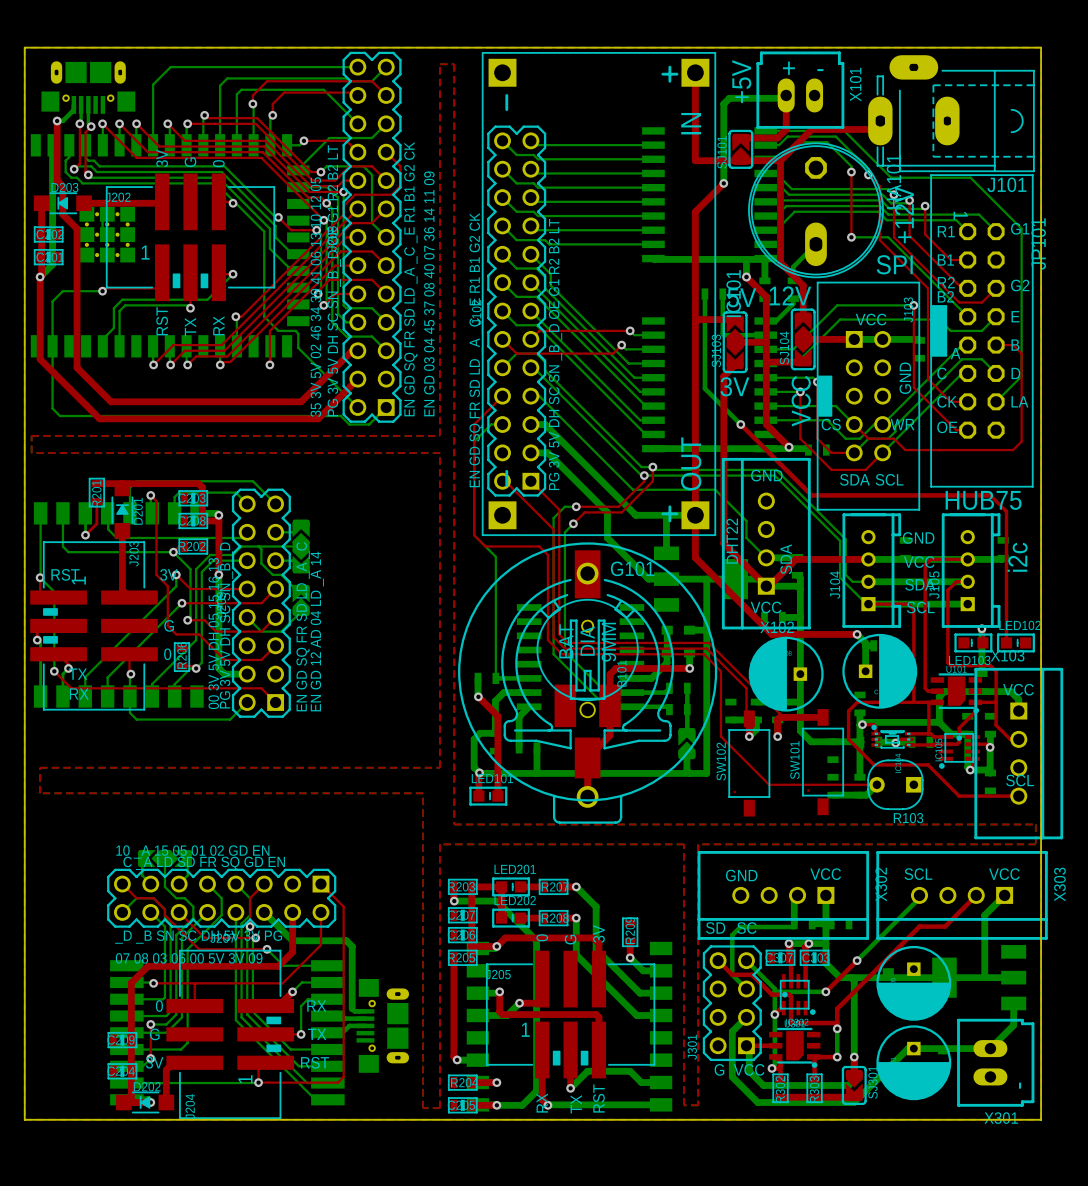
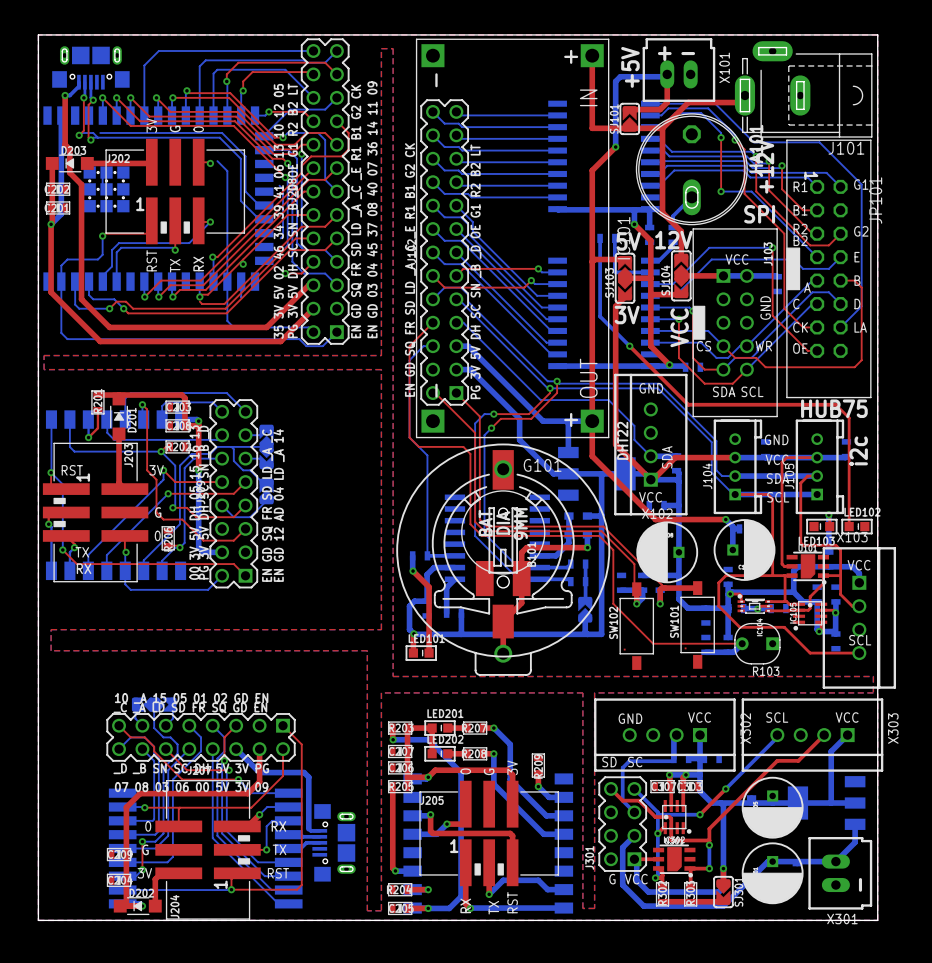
bottom track: (69, 145) (69, 157) (65, 160) (65, 172) (71, 177) (77, 177) (82, 183) (216, 183) (264, 231) (264, 316) (278, 330) (295, 330) (298, 333) (298, 347) (352, 401) -> (227, 171) (227, 320) (233, 327) (308, 327)
bottom track: (86, 145) (86, 158) (88, 160) (94, 160) (99, 166) -> none
bottom track: (224, 166) (275, 217) (278, 217) -> none
bottom track: (221, 172) (275, 225) -> (203, 132) (222, 132) (245, 156) (245, 182)
bottom track: (88, 174) (91, 177) (218, 177) (241, 200) -> (90, 140) (97, 137)
bottom track: (253, 212) (269, 228) -> (201, 137) (219, 137) (240, 158) (240, 184)
top track: (278, 217) (291, 230) (316, 230) -> none
via: (278, 217) -> none
via: (316, 230) -> none
top track: (326, 265) (340, 251) (372, 251) (386, 265) -> (287, 214) (294, 214)
top track: (335, 265) (269, 330) (269, 364) -> none
top track: (343, 279) (329, 279) (318, 291) (318, 294) -> (301, 226) (224, 304) (202, 304) (199, 301)
top track: (372, 279) (386, 294) -> (325, 226) (336, 214)
bottom track: (102, 291) (62, 291) (52, 301) (52, 327) -> (102, 236) (102, 254) (97, 259) (67, 259) (61, 265)
via: (318, 294) -> none
top track: (336, 294) (323, 305) -> (295, 238) (225, 308) (133, 308) (126, 301) (116, 301) (109, 308)
top track: none -> (336, 238) (325, 250) (290, 250) (226, 313) (128, 313) (123, 308)
bottom track: (337, 299) (337, 313) (346, 322) (357, 322) -> (297, 243) (301, 247)
via: (323, 305) -> none
top track: none -> (313, 261) (301, 273) (285, 273)
via: none -> (243, 264)
via: none -> (285, 273)
bottom track: none -> (75, 281) (75, 304) (79, 308) (109, 308)
bottom track: none -> (89, 281) (89, 295) (93, 299) (114, 299) (123, 308)
via: (269, 364) -> none
via: none -> (109, 308)
via: none -> (123, 308)

